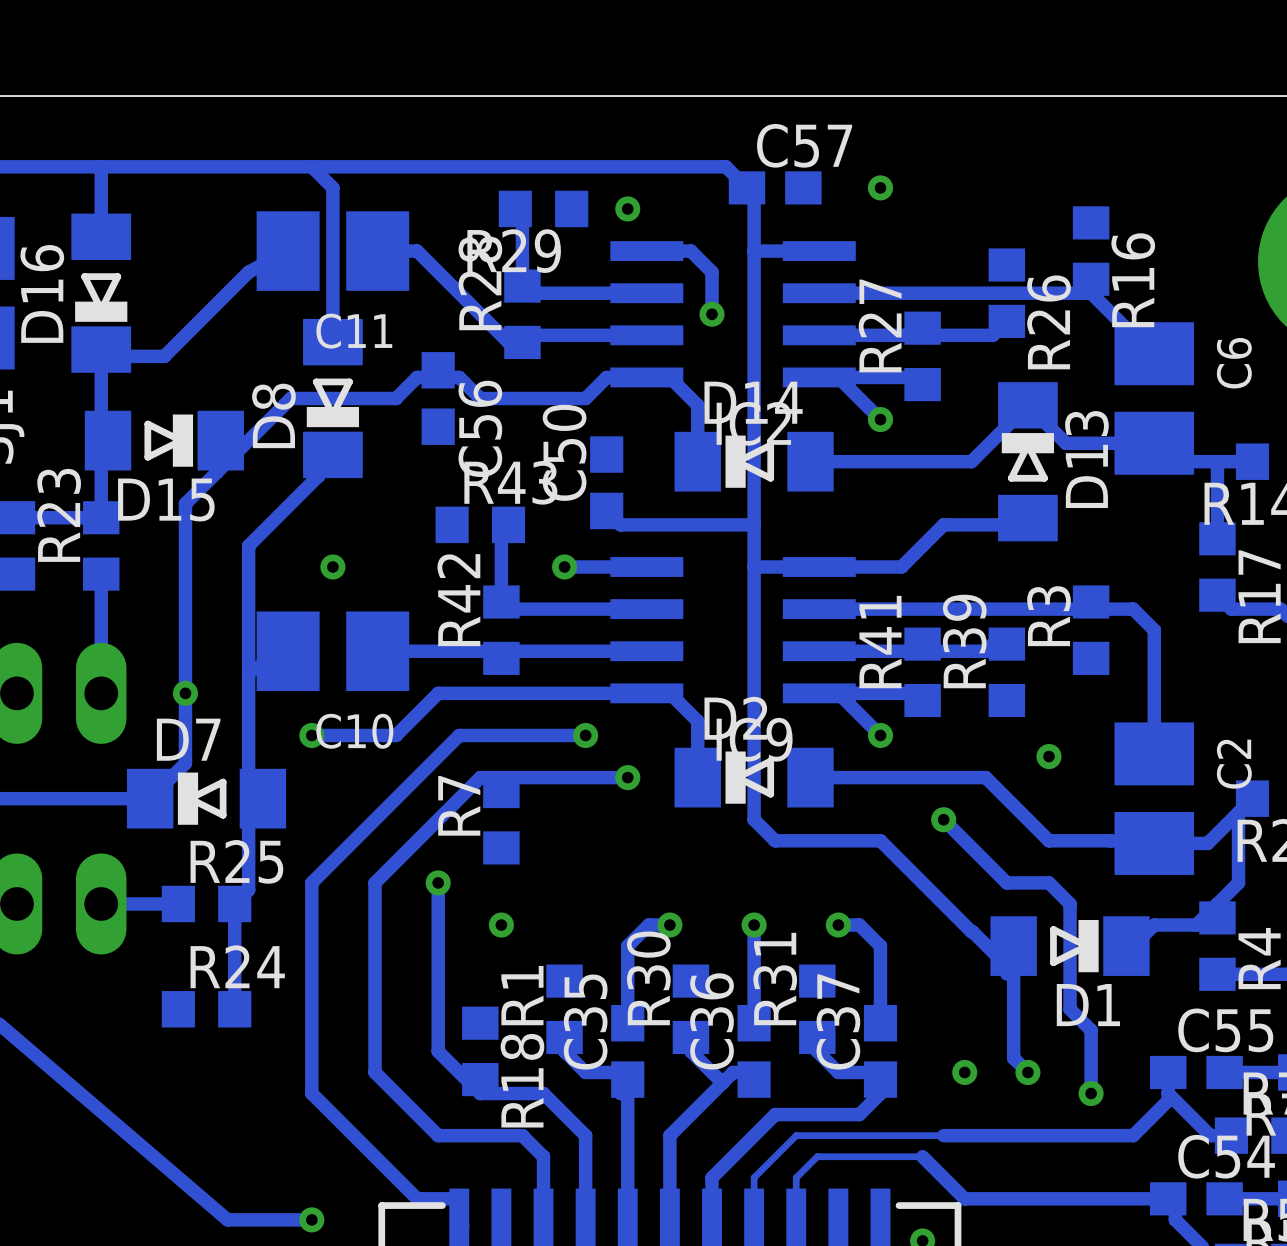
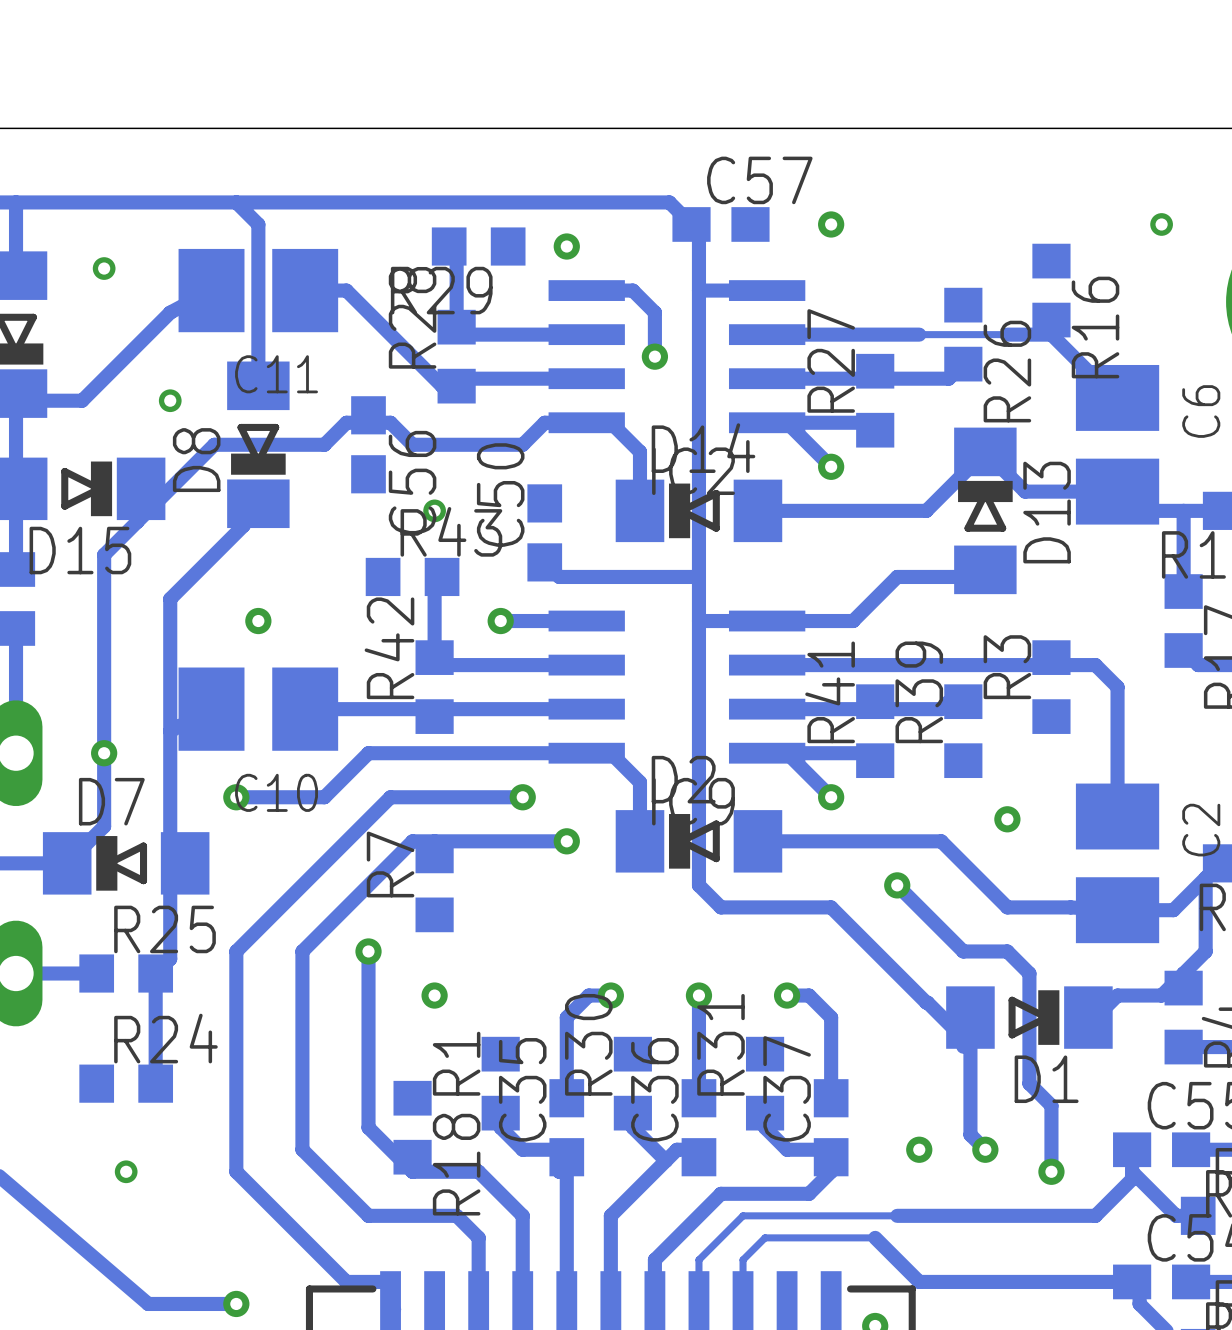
via: none -> (1161, 224)
via: none -> (104, 268)
track width: thick (1048, 293) (964, 293) -> thin (1007, 334) (919, 334)
via: none -> (170, 400)
via: none -> (434, 510)
via: none -> (126, 1171)

